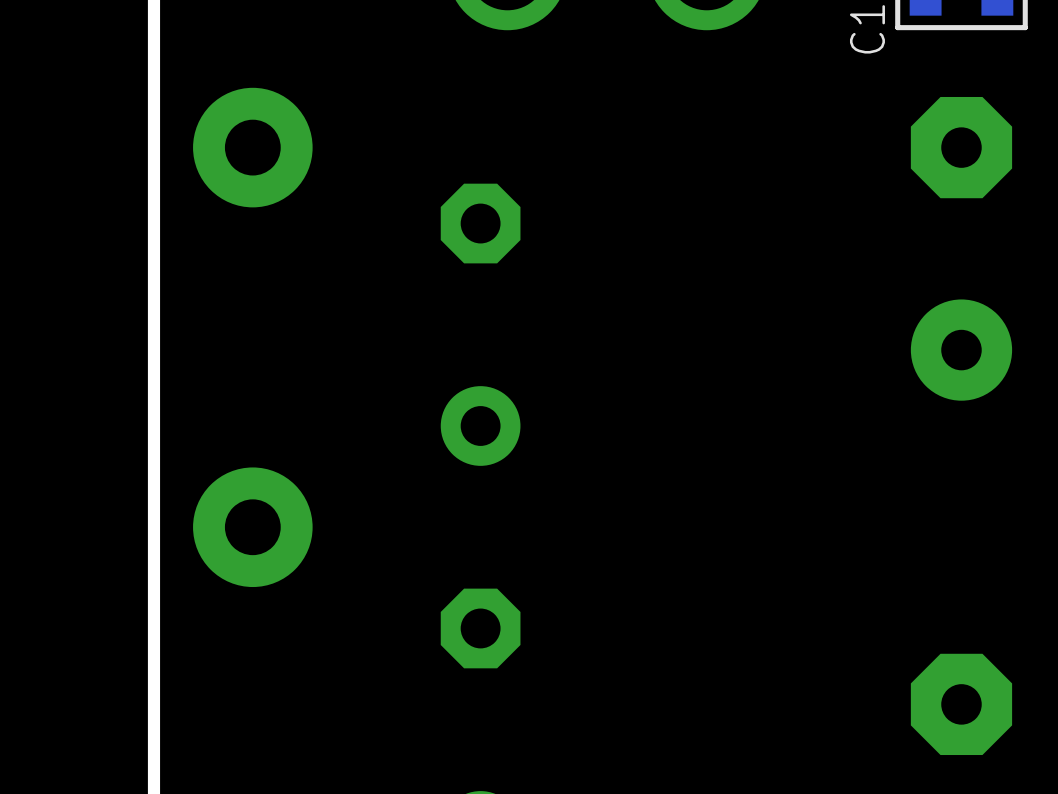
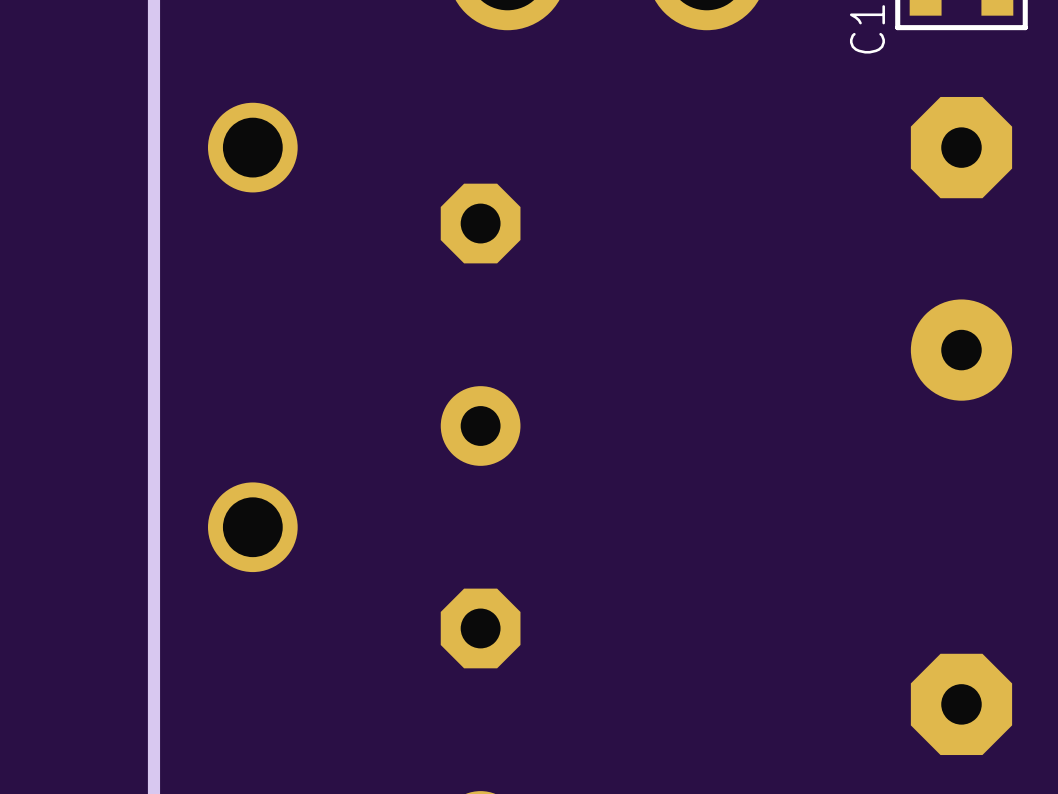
part footprint: [193, 87, 313, 208] -> [207, 102, 298, 193]
part footprint: [193, 467, 313, 588] -> [207, 482, 298, 573]

